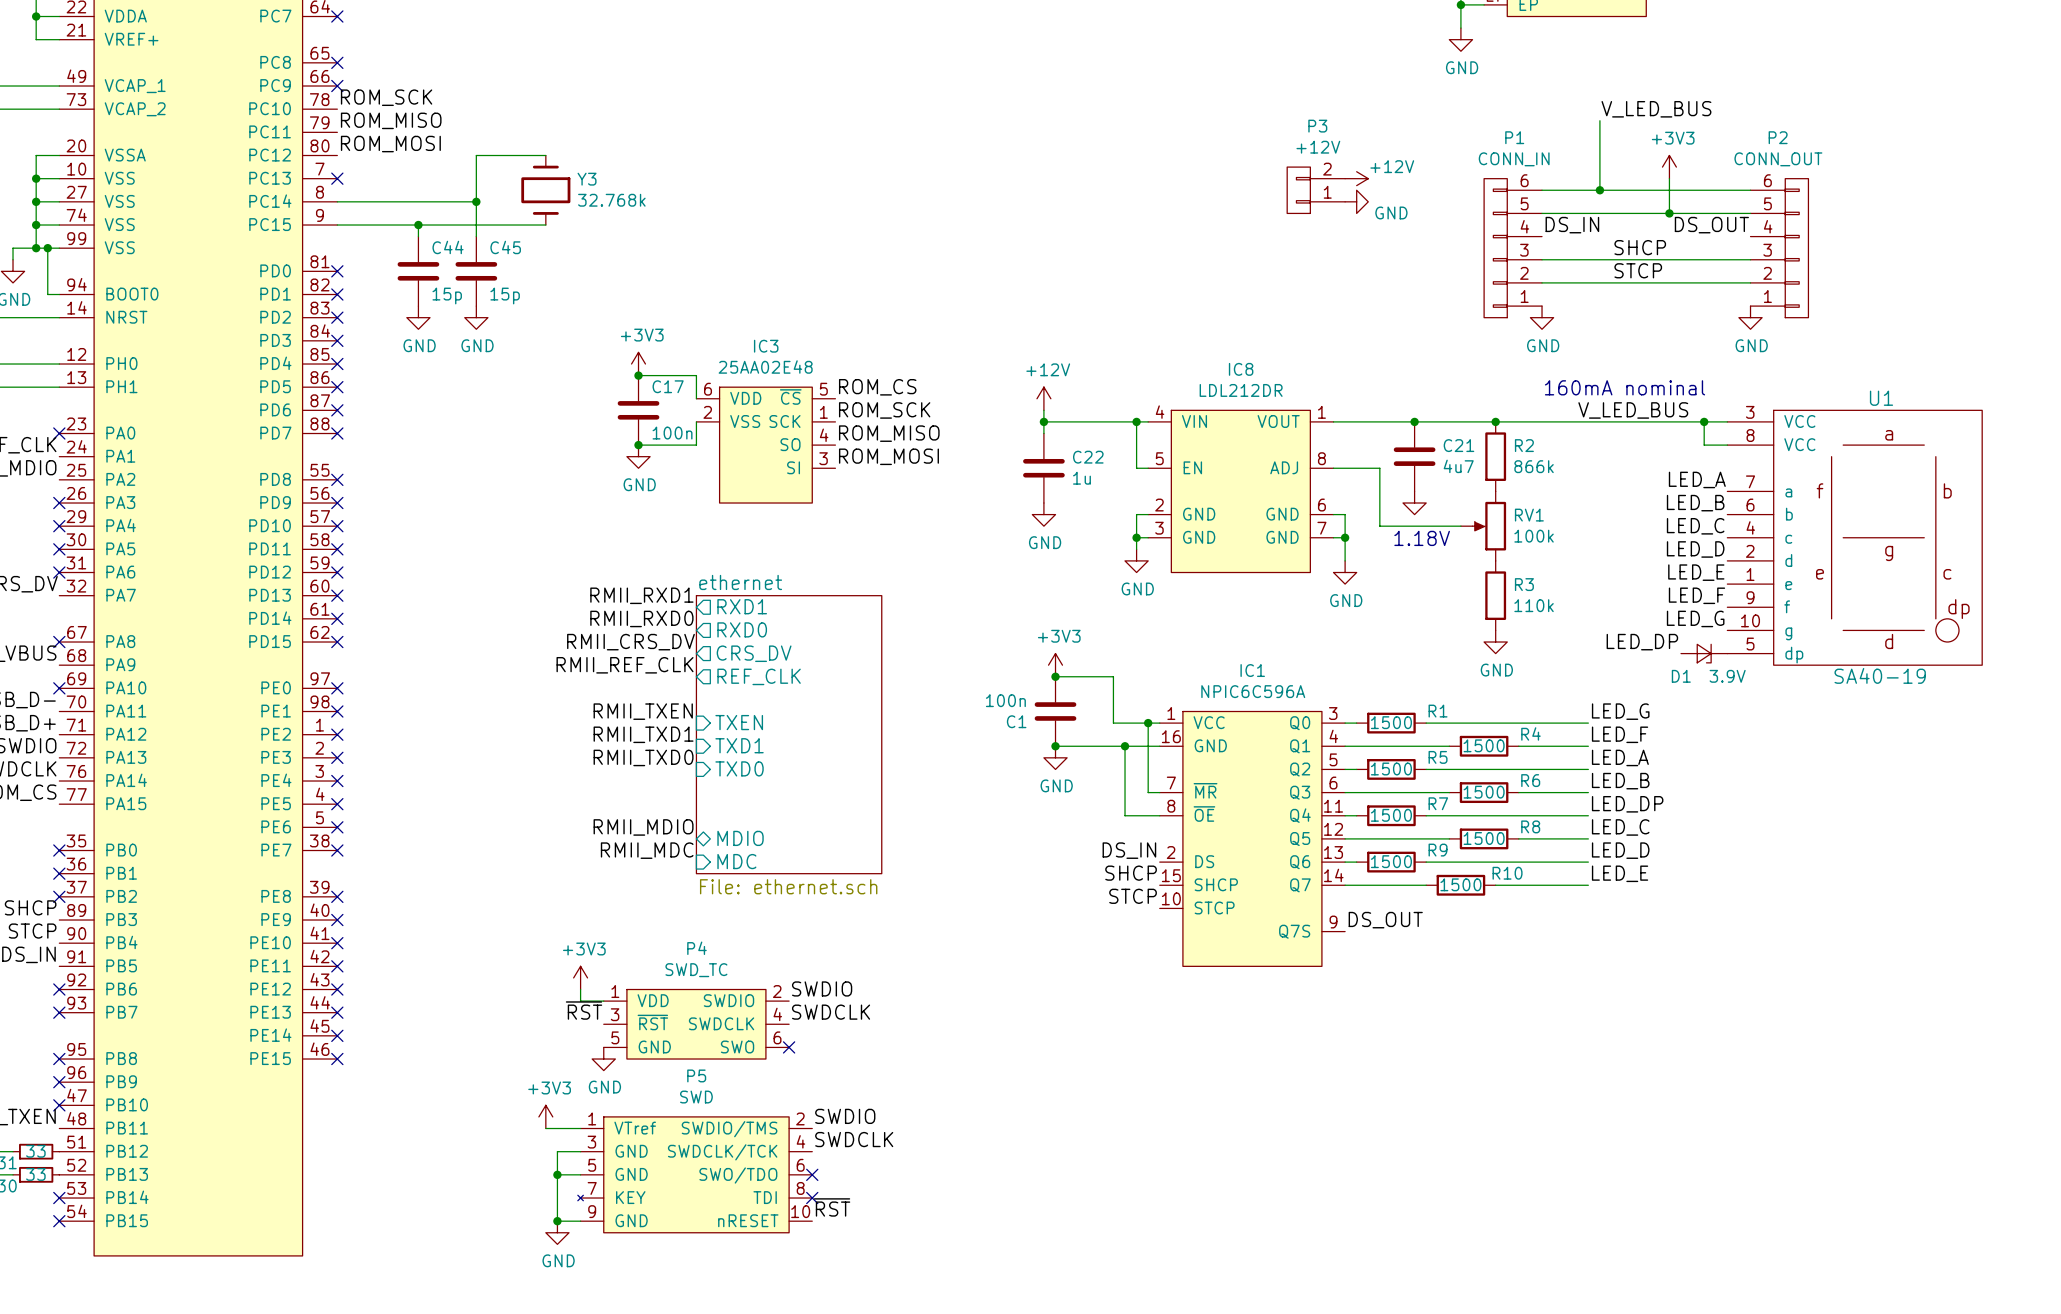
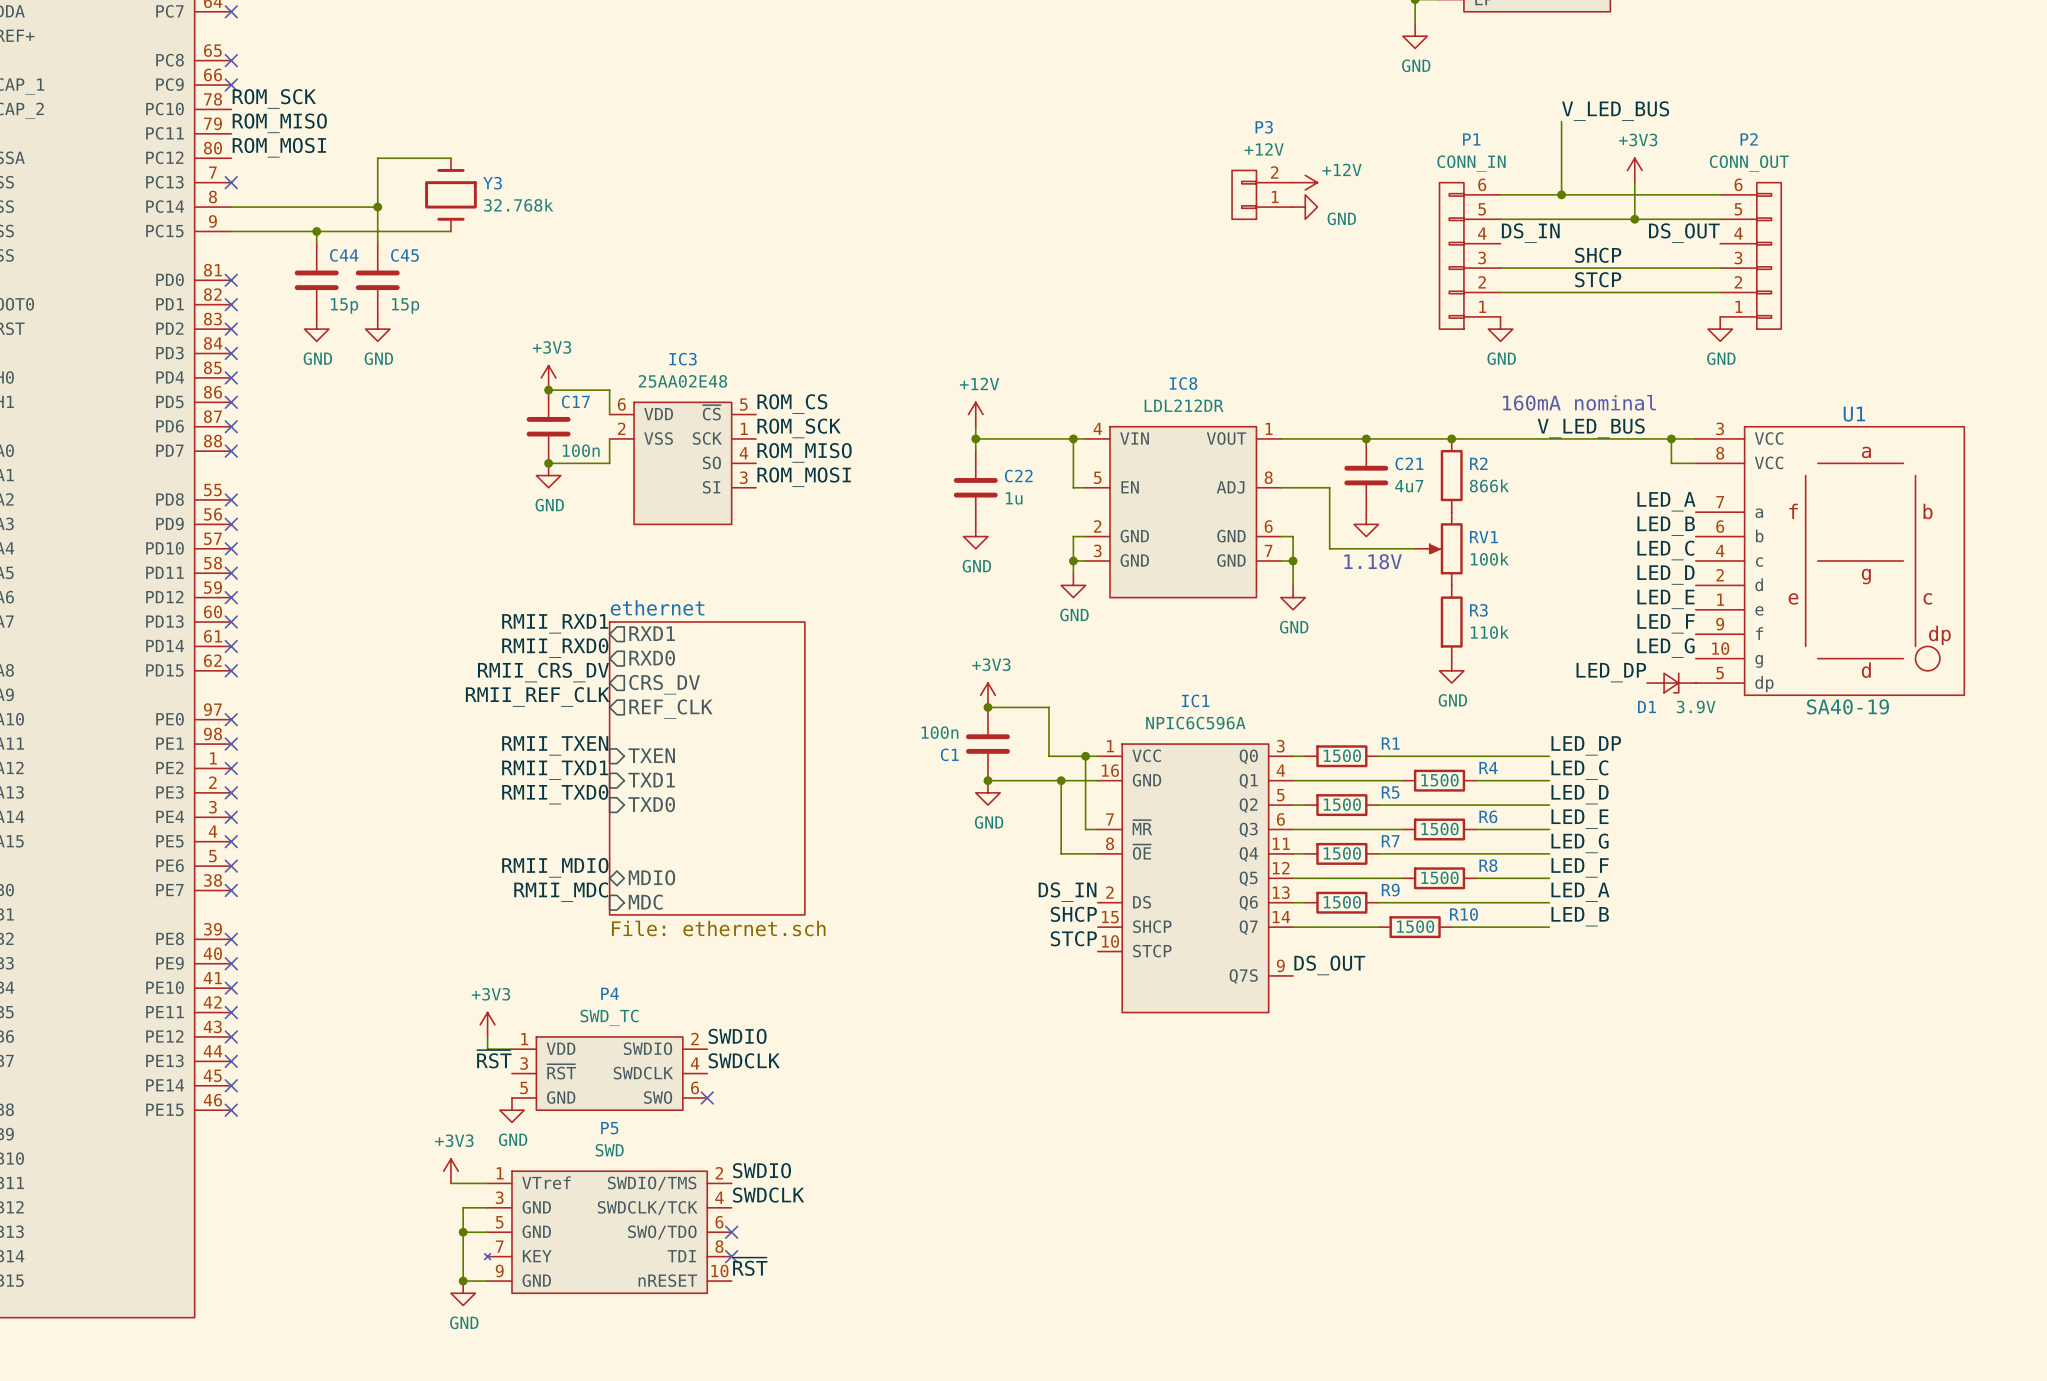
label: LED_G (1620, 711) -> LED_DP (1586, 745)
label: LED_F (1620, 734) -> LED_C (1579, 770)
label: LED_A (1620, 757) -> LED_D (1580, 794)
label: LED_B (1620, 781) -> LED_E (1580, 819)
label: LED_DP (1627, 804) -> LED_G (1580, 843)
label: LED_C (1620, 827) -> LED_F (1580, 867)
label: LED_D (1620, 850) -> LED_A (1580, 892)
label: LED_E (1620, 873) -> LED_B (1580, 916)

